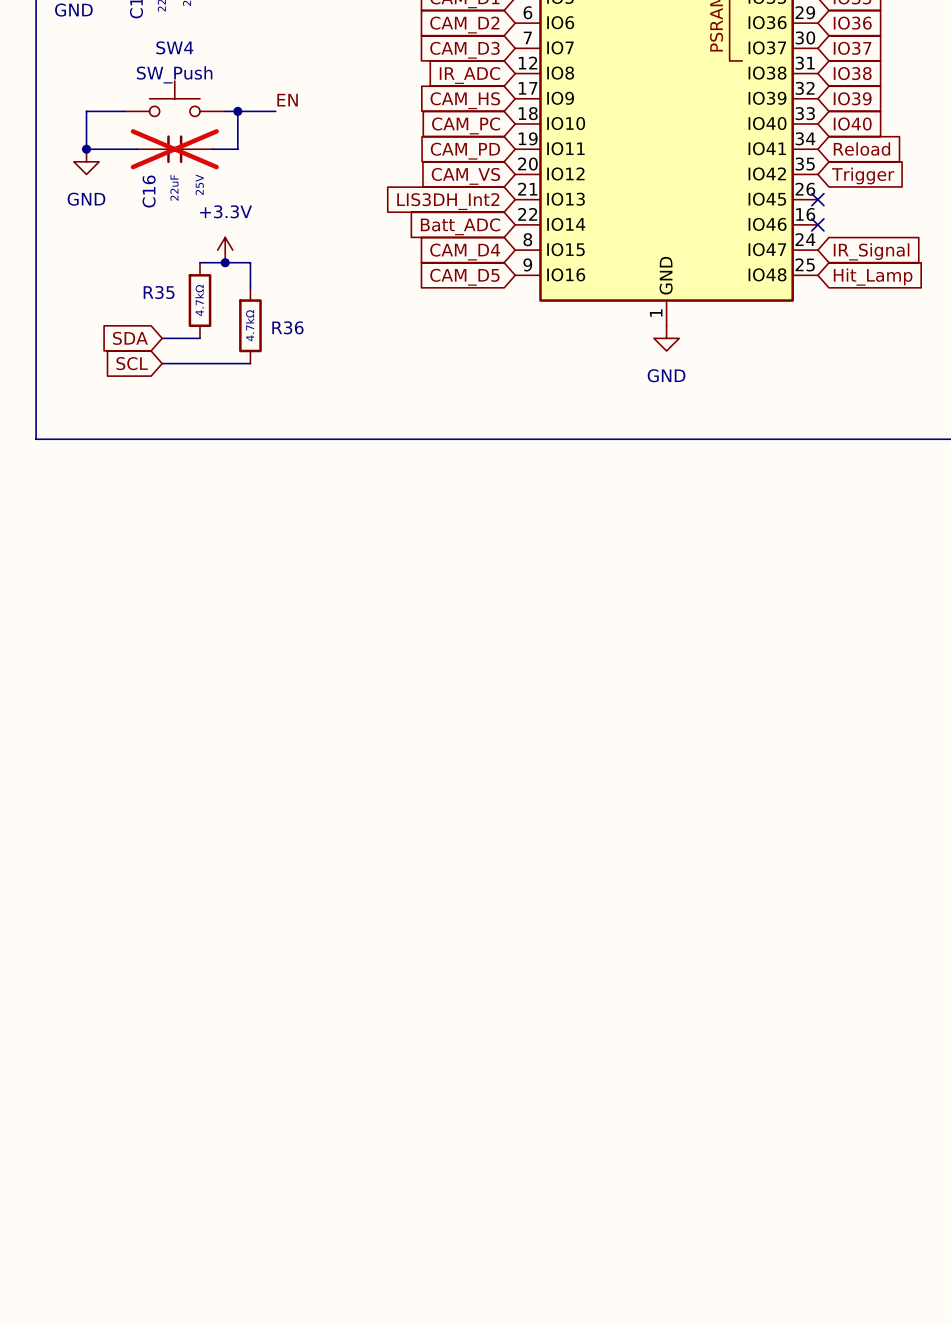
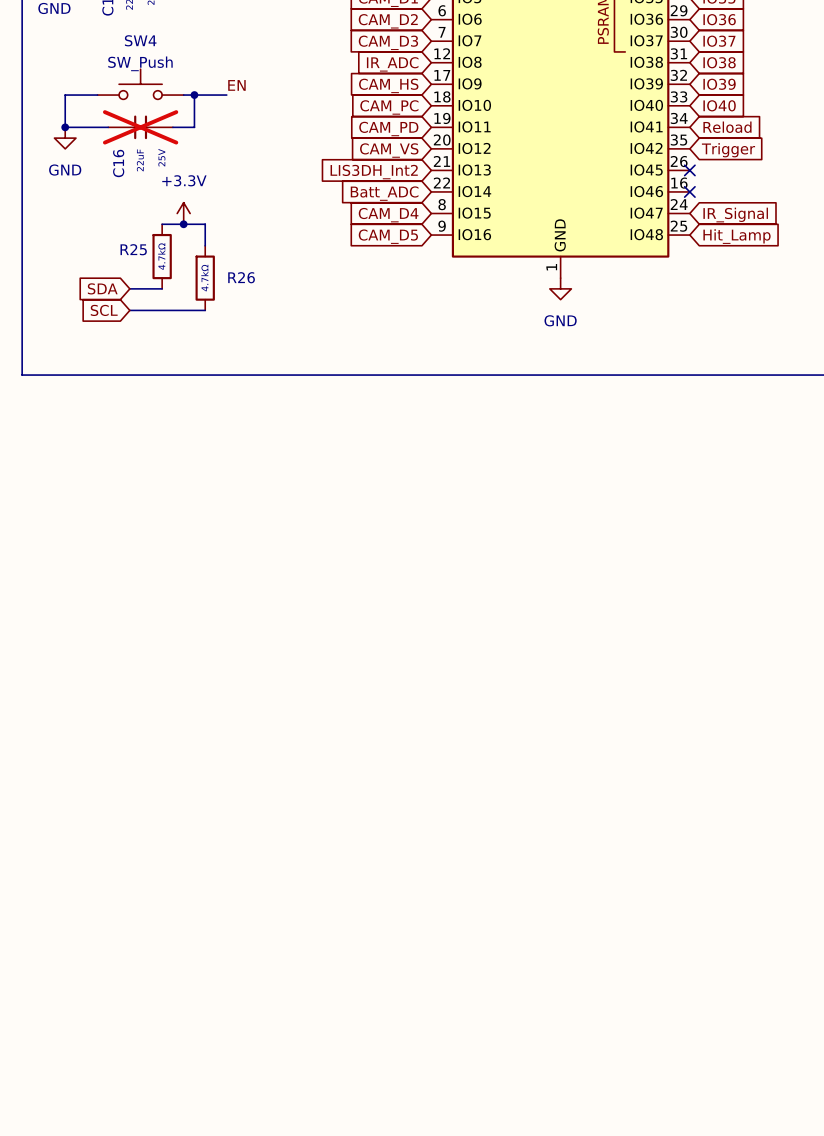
R35 name: R35 (159, 292) -> R25 (133, 249)
R36 name: R36 (287, 327) -> R26 (241, 277)

